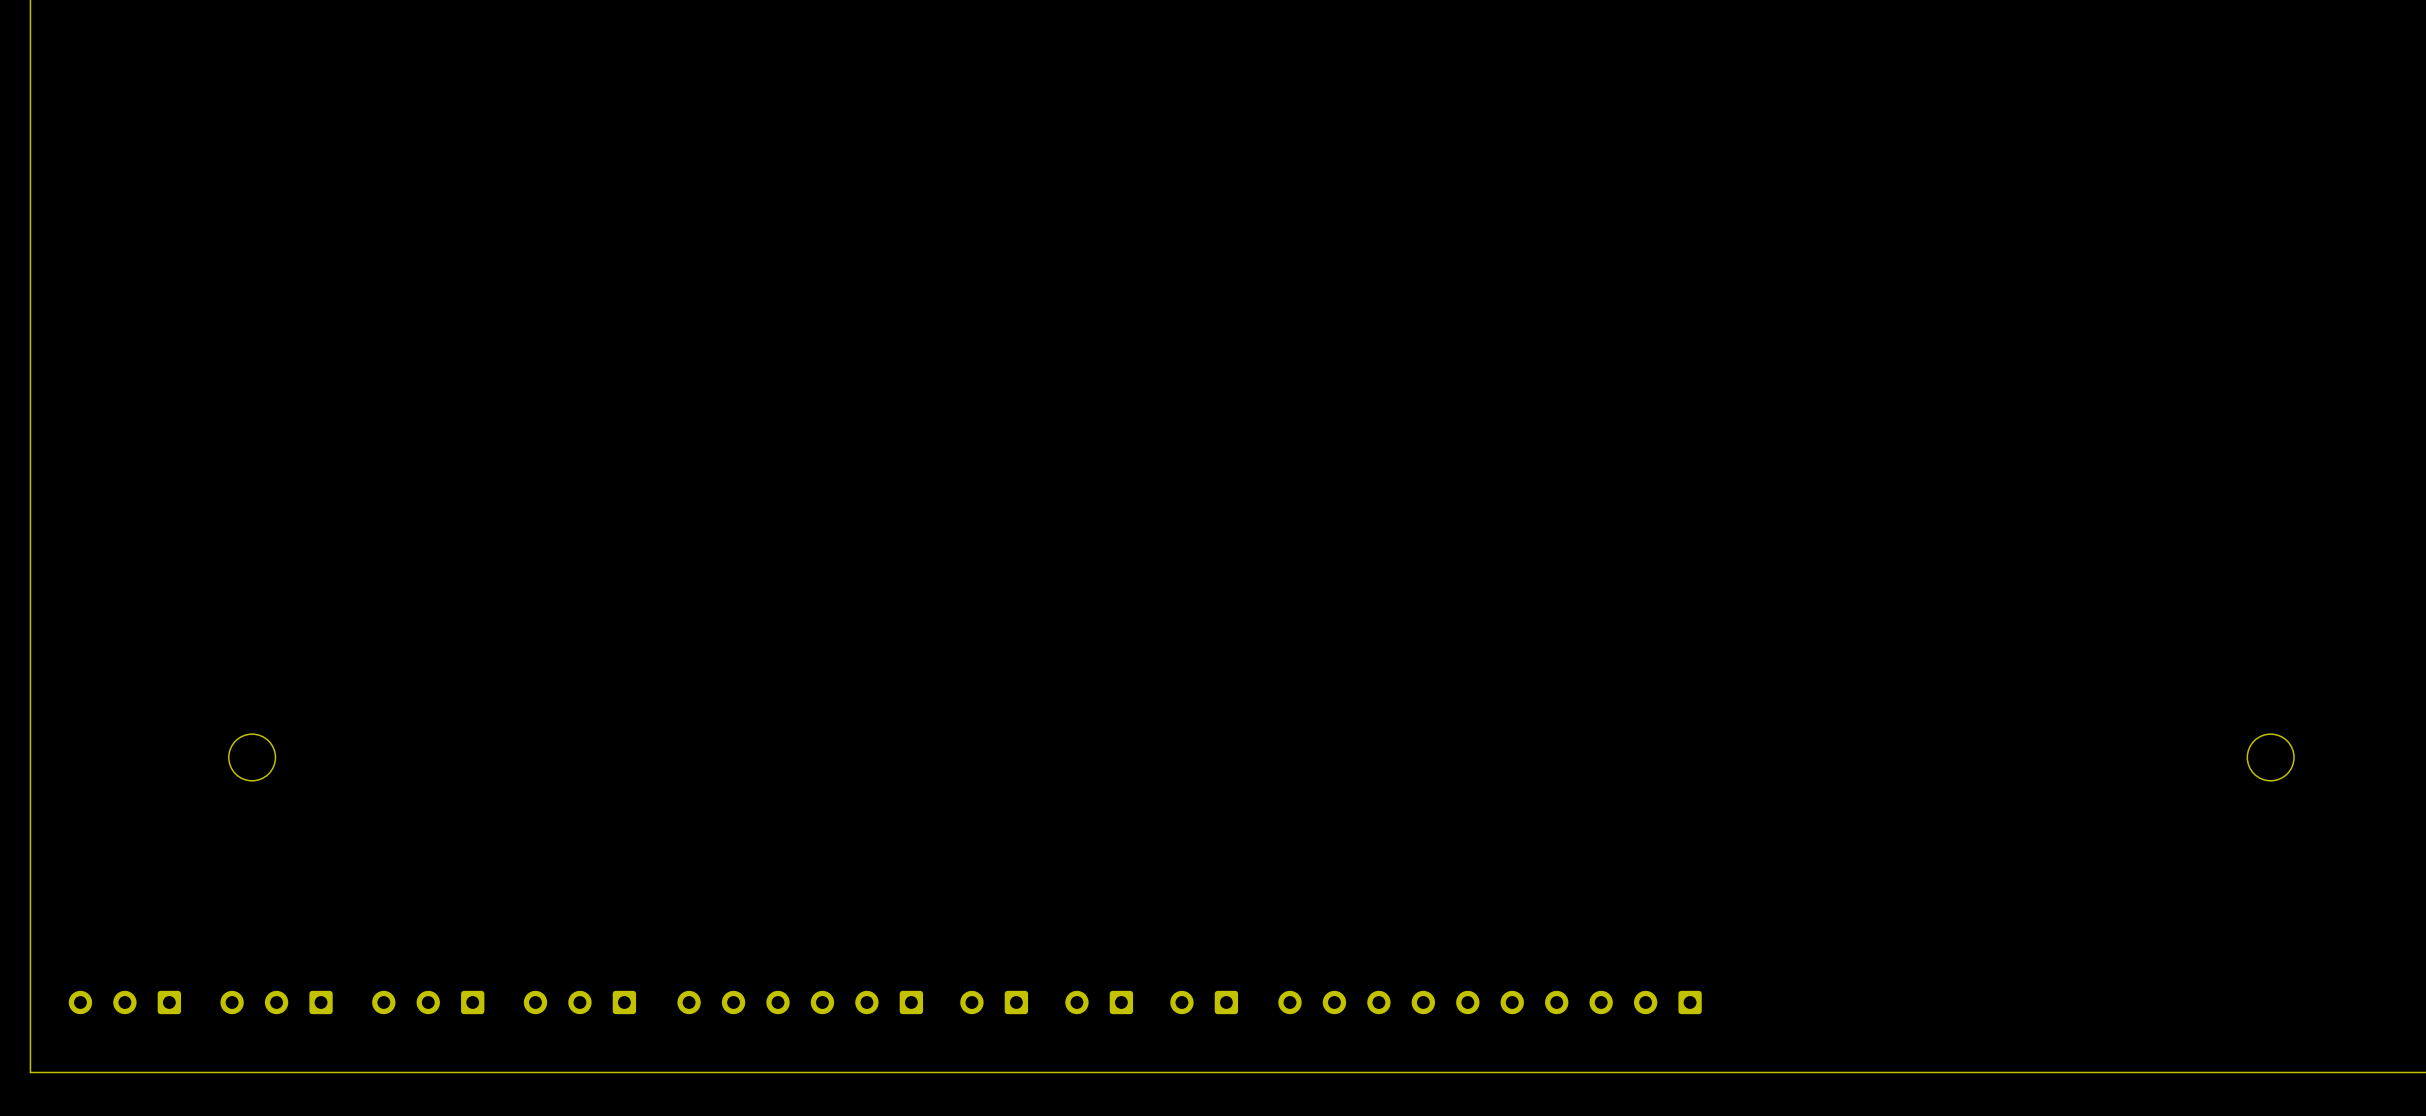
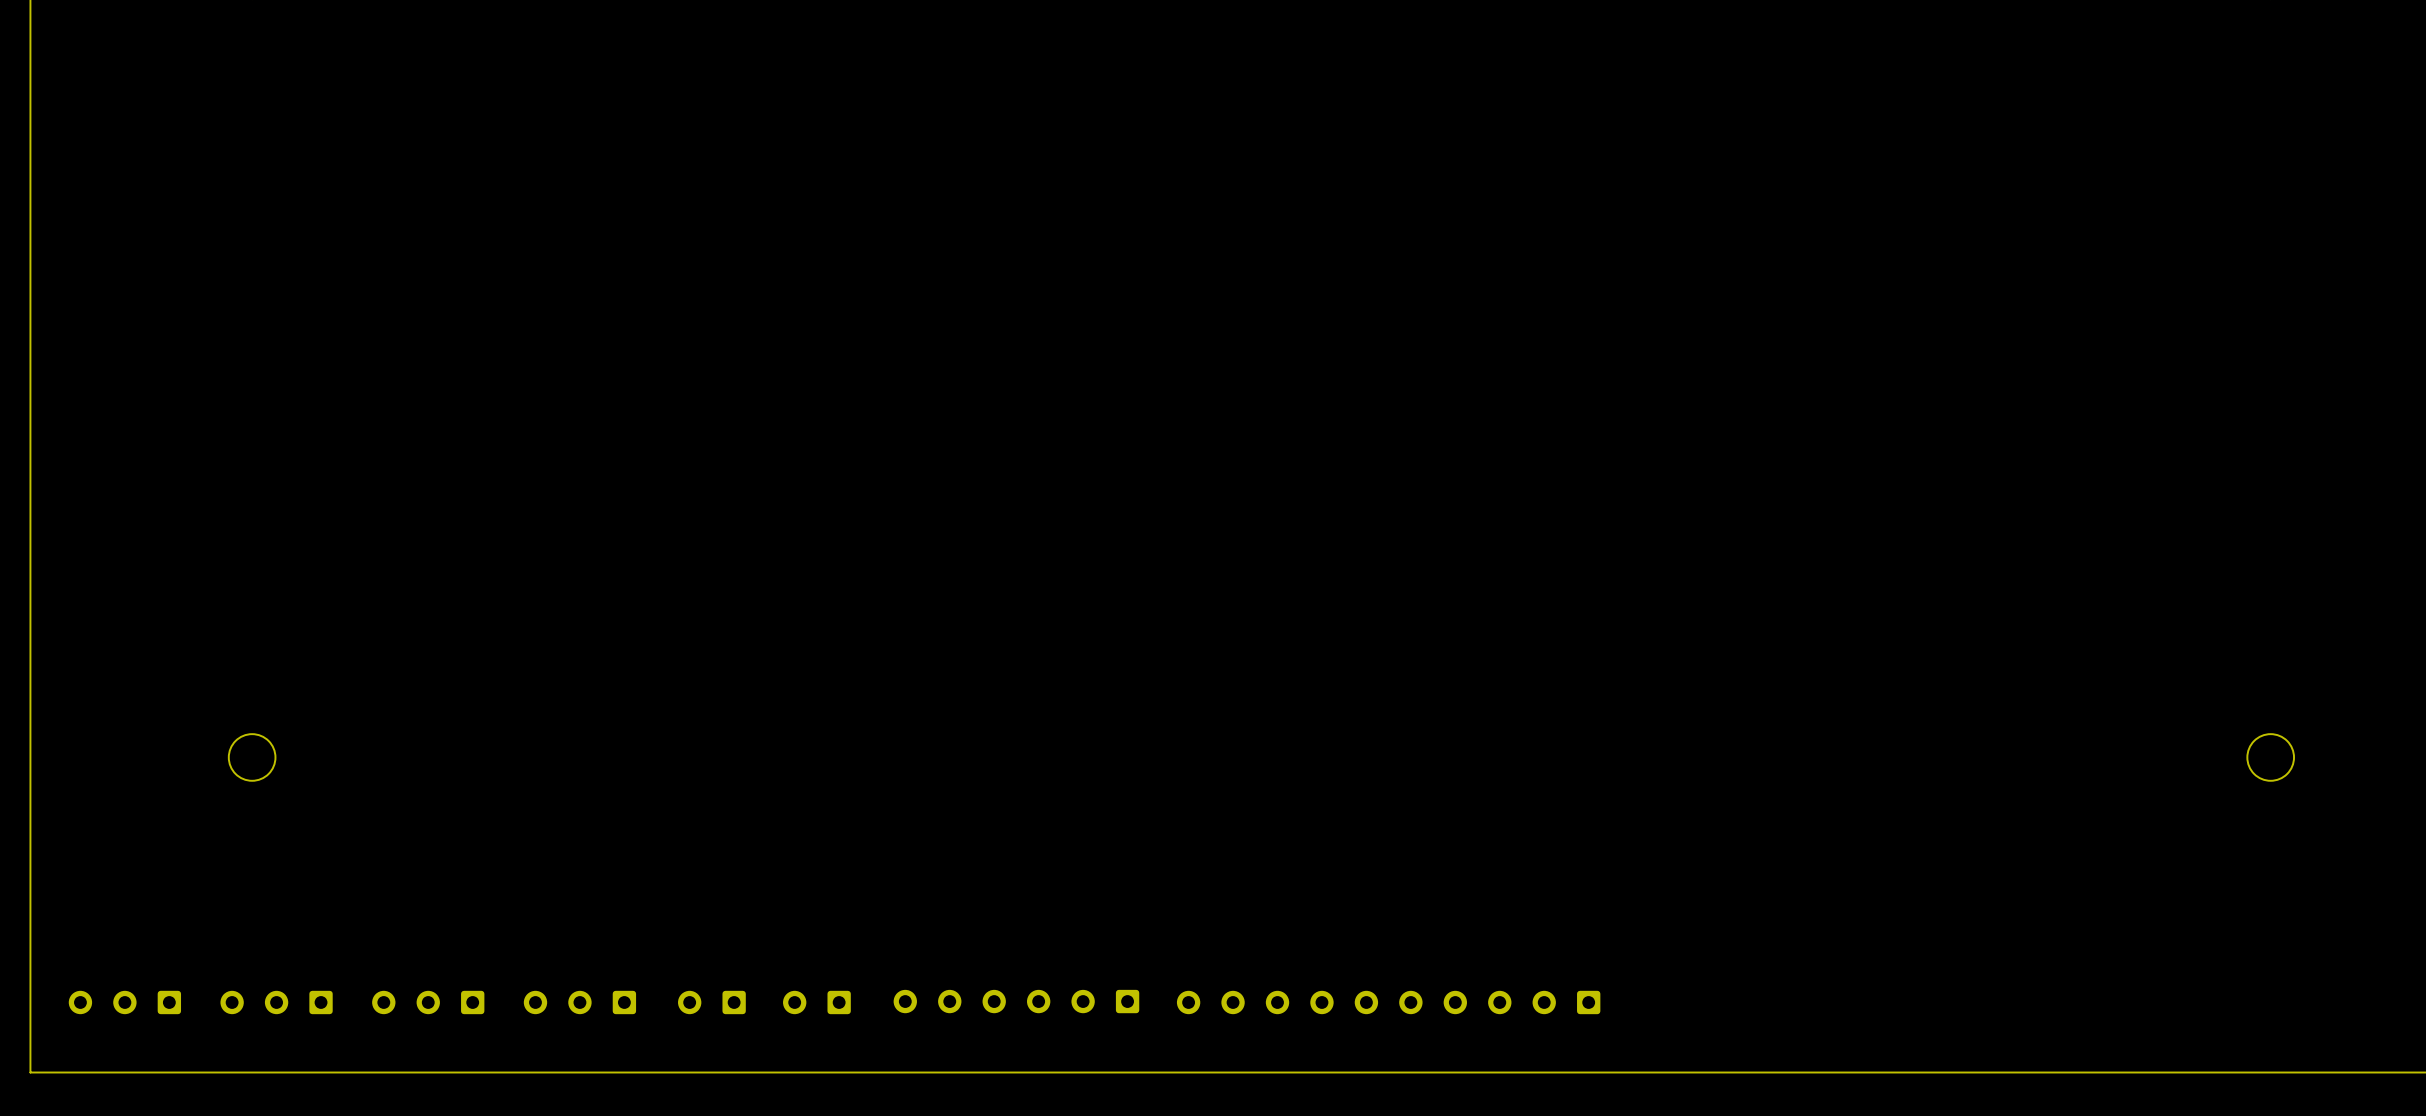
part: none -> (711, 1002)
part position: (800, 1002) -> (1016, 1001)
part: none -> (816, 1002)
part: (994, 1002) -> none
part: (1099, 1002) -> none
part: (1204, 1002) -> none
part position: (1490, 1002) -> (1388, 1002)

